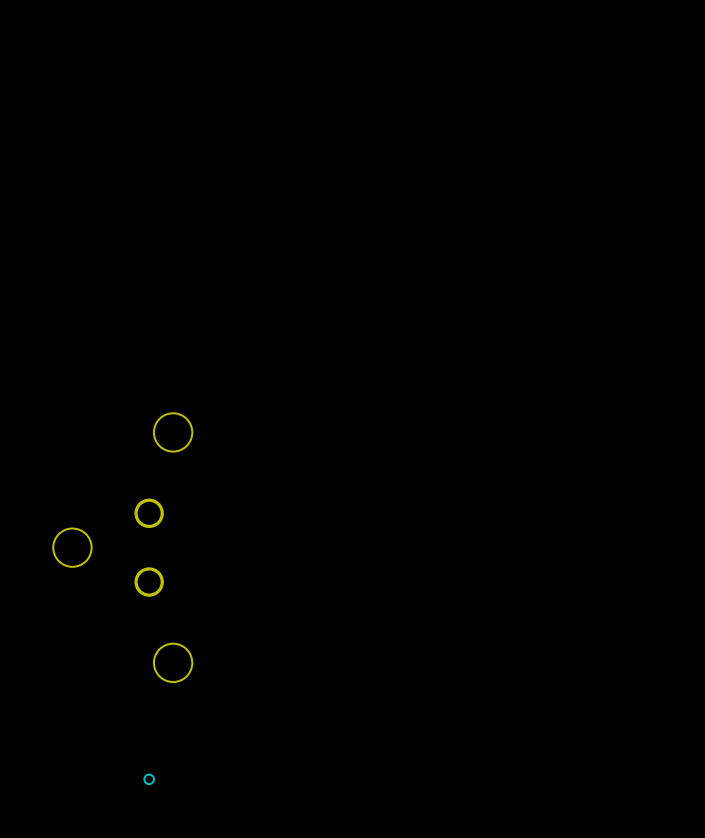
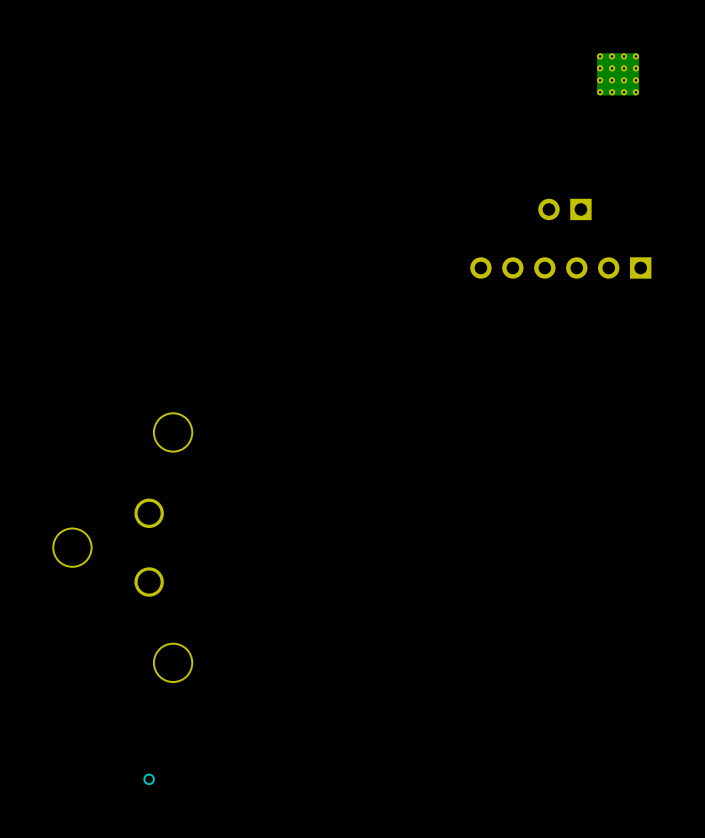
part: none -> (618, 74)
part: none -> (564, 209)
part: none -> (560, 267)

